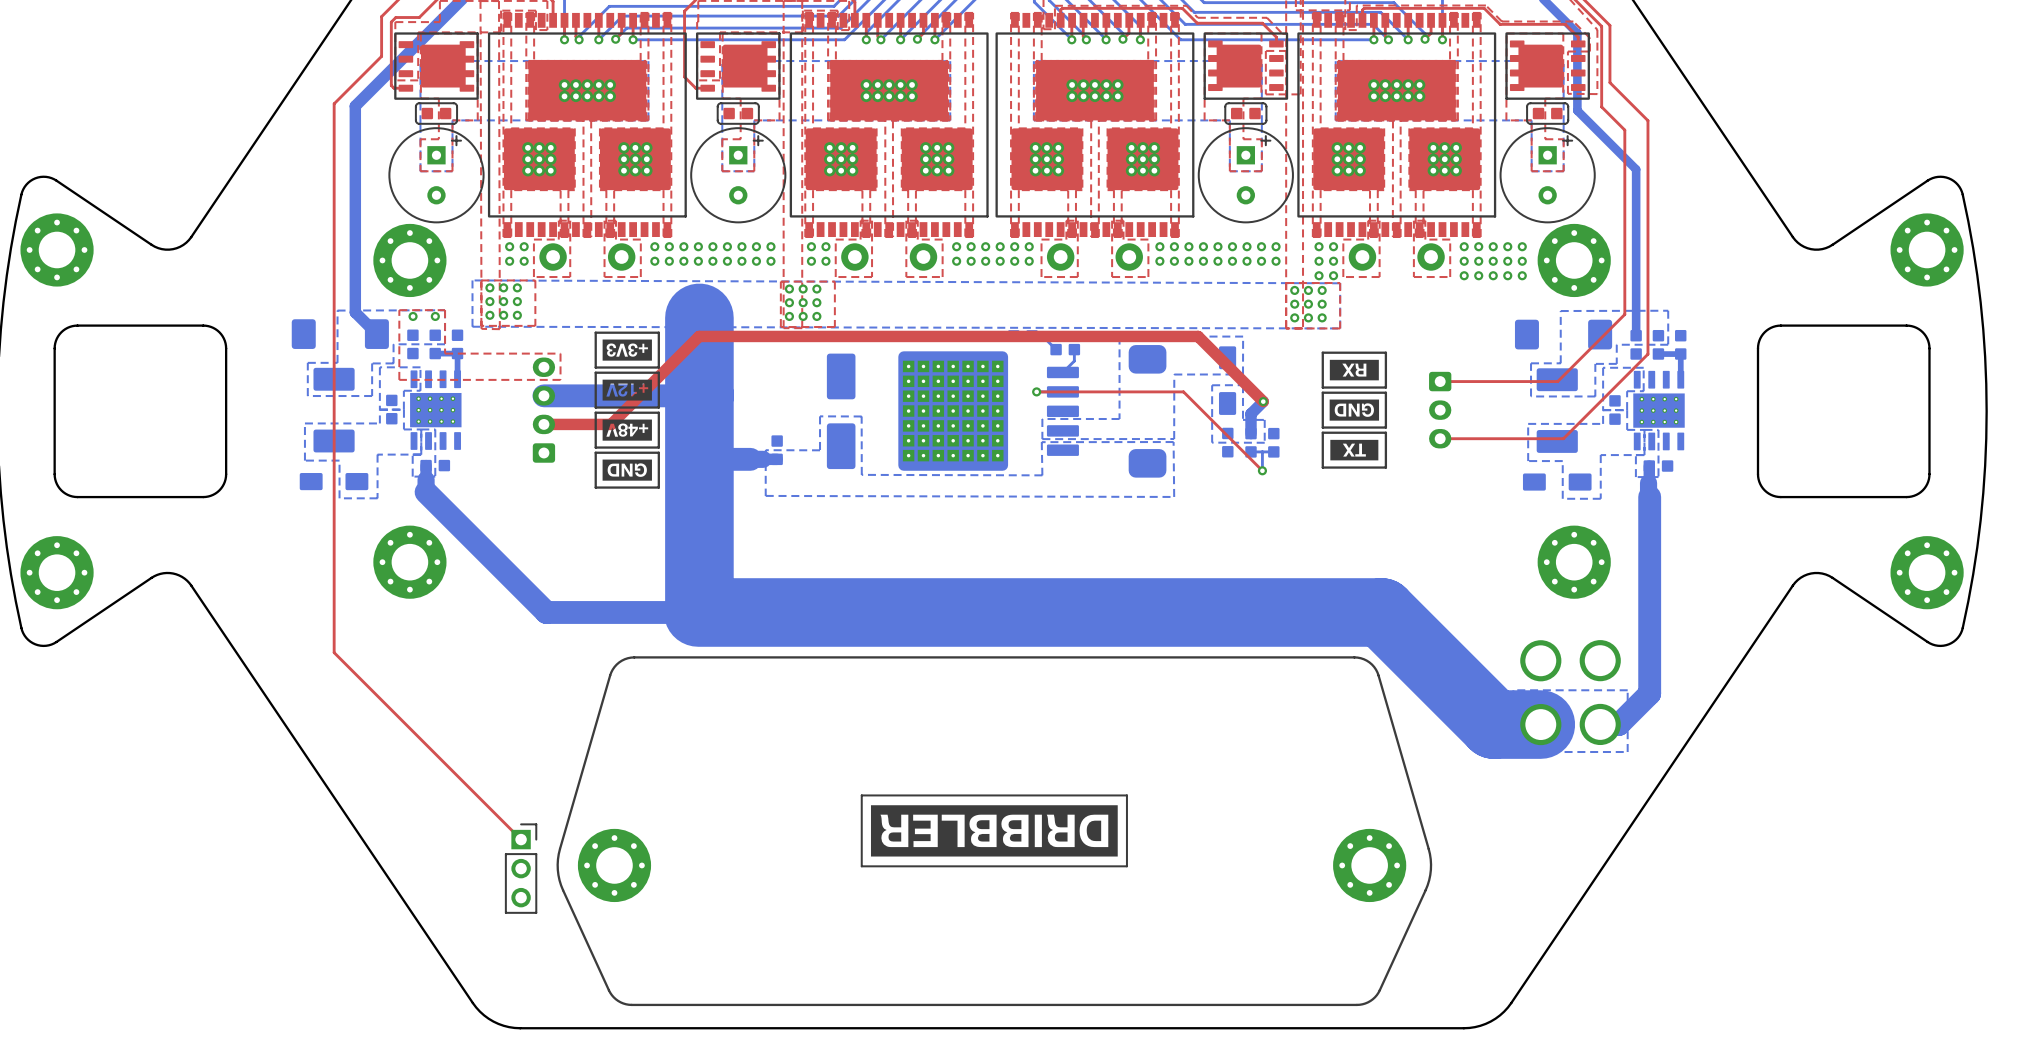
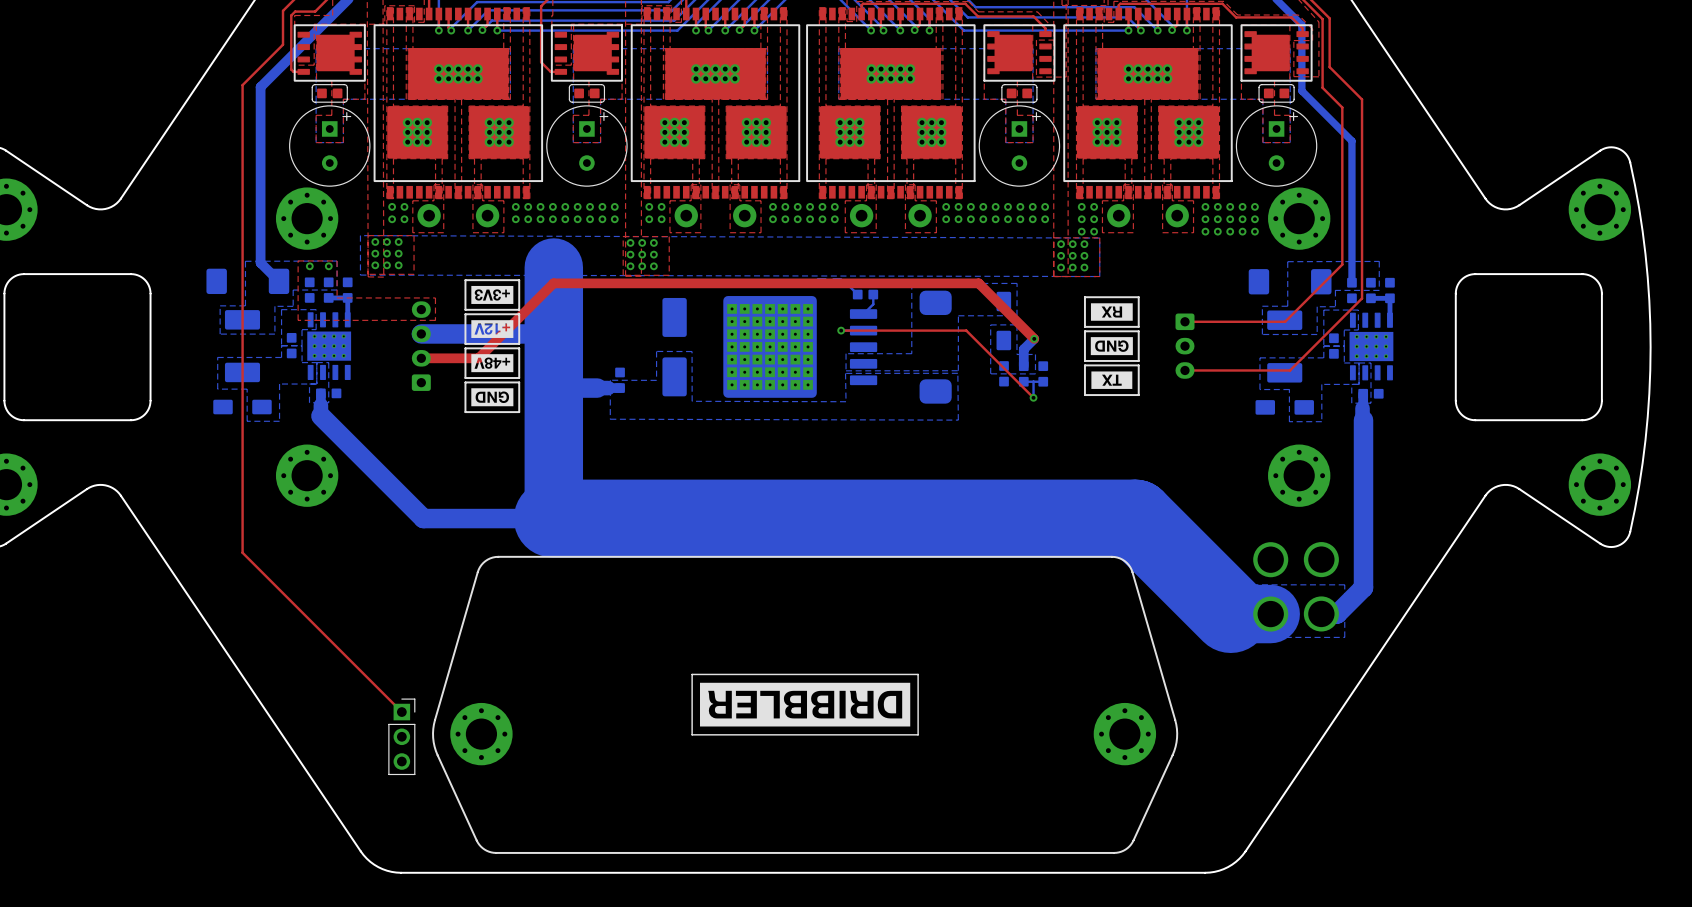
bottom track width: thin (698, 612) (1381, 612) (1493, 724) -> thick (552, 518) (1135, 518) (1230, 614)

